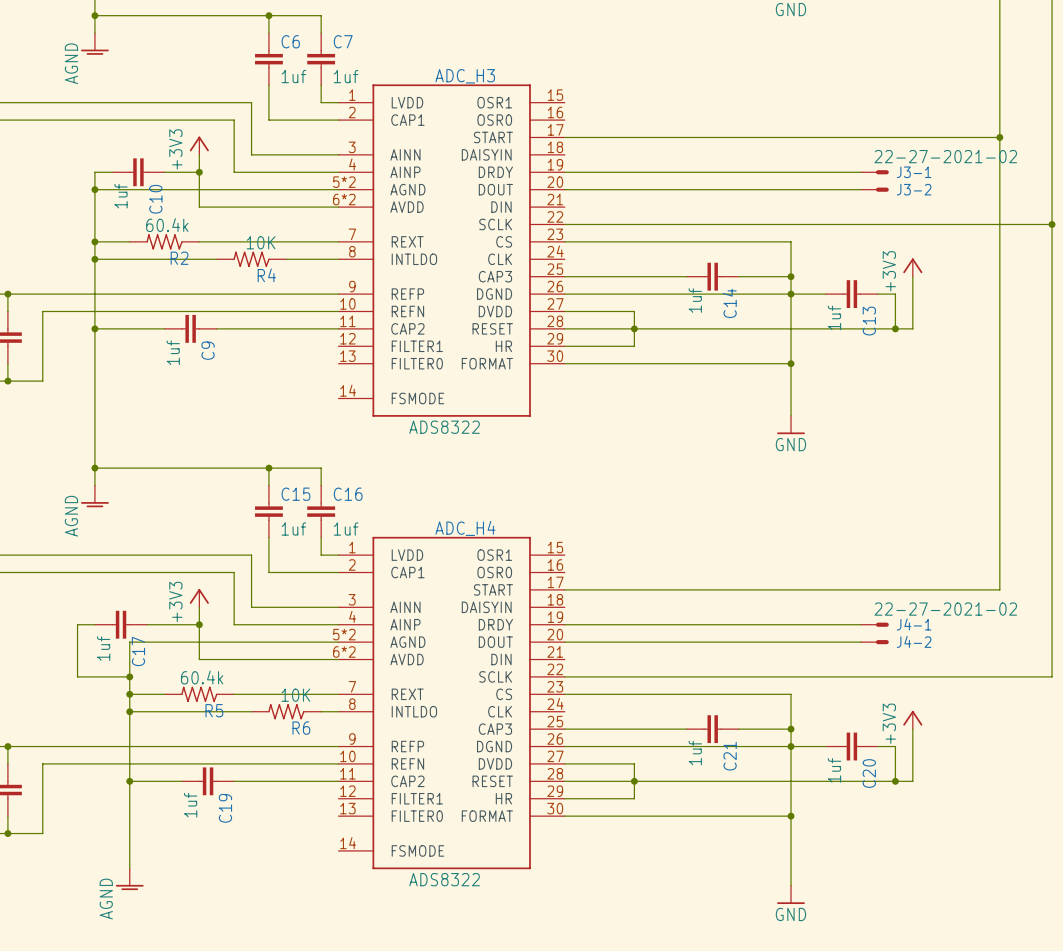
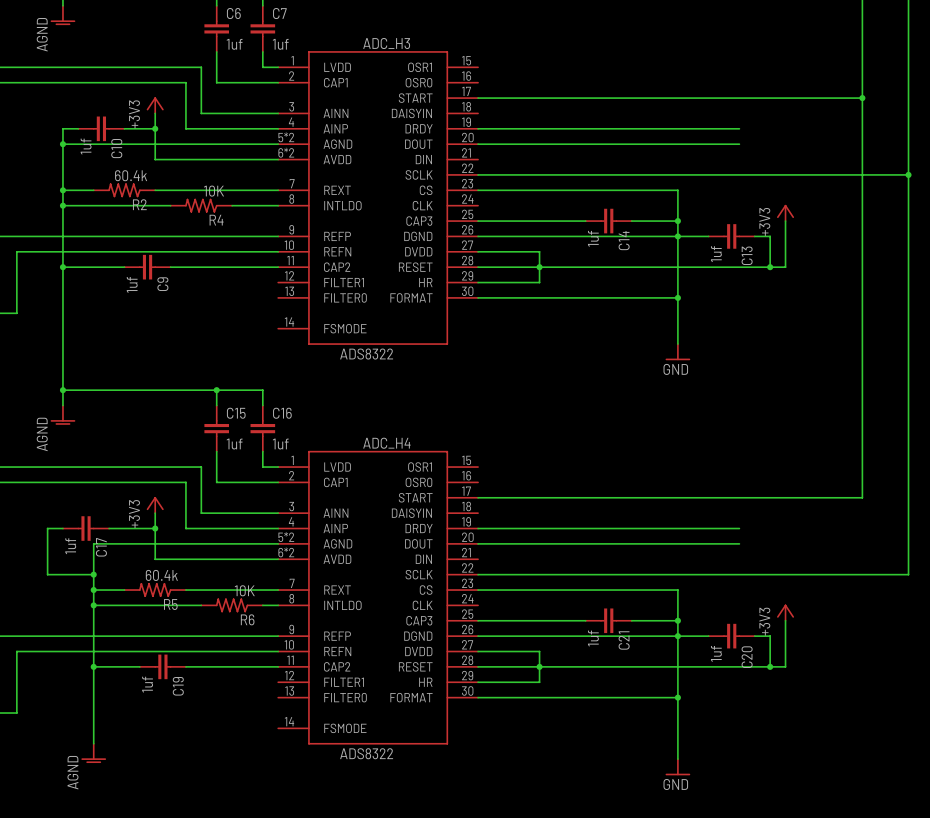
J3-1: 22-27-2021-02 (874, 172) -> none
J3-2: (874, 189) -> none
J4-1: 22-27-2021-02 (874, 624) -> none
J4-2: (874, 642) -> none

